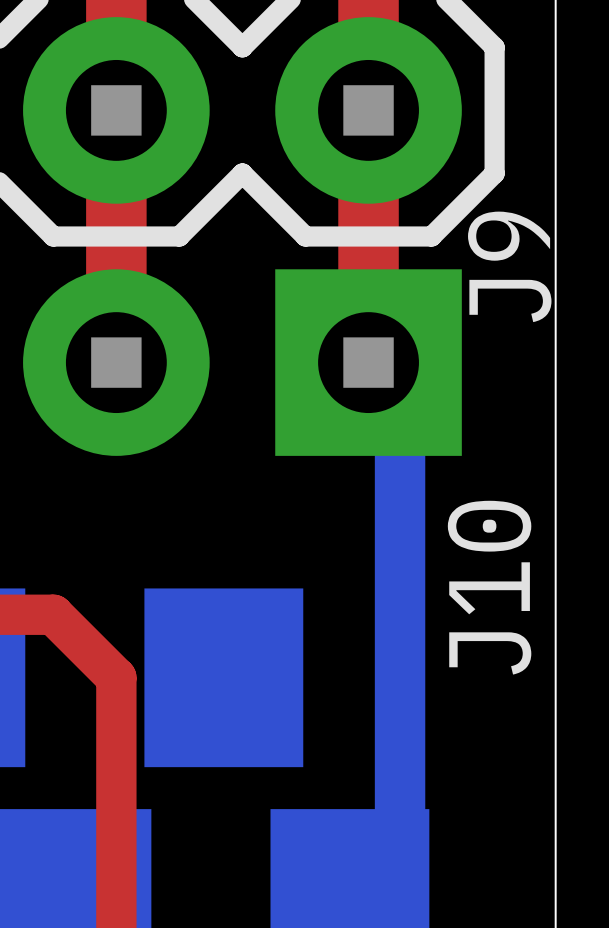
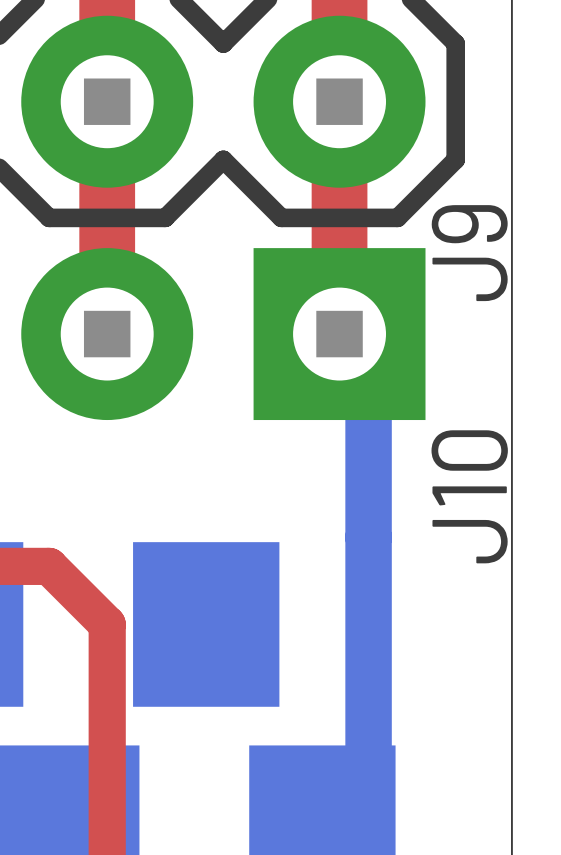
J10 name position: J10 (489, 587) -> J10 (469, 496)

